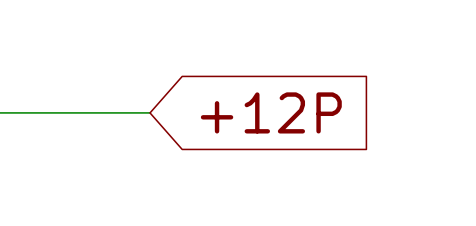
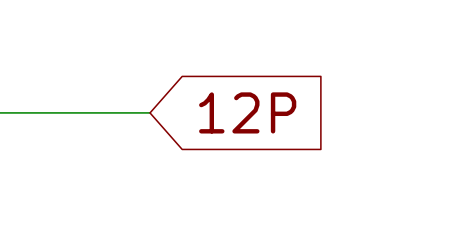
global label: +12P (271, 112) -> 12P (247, 112)

